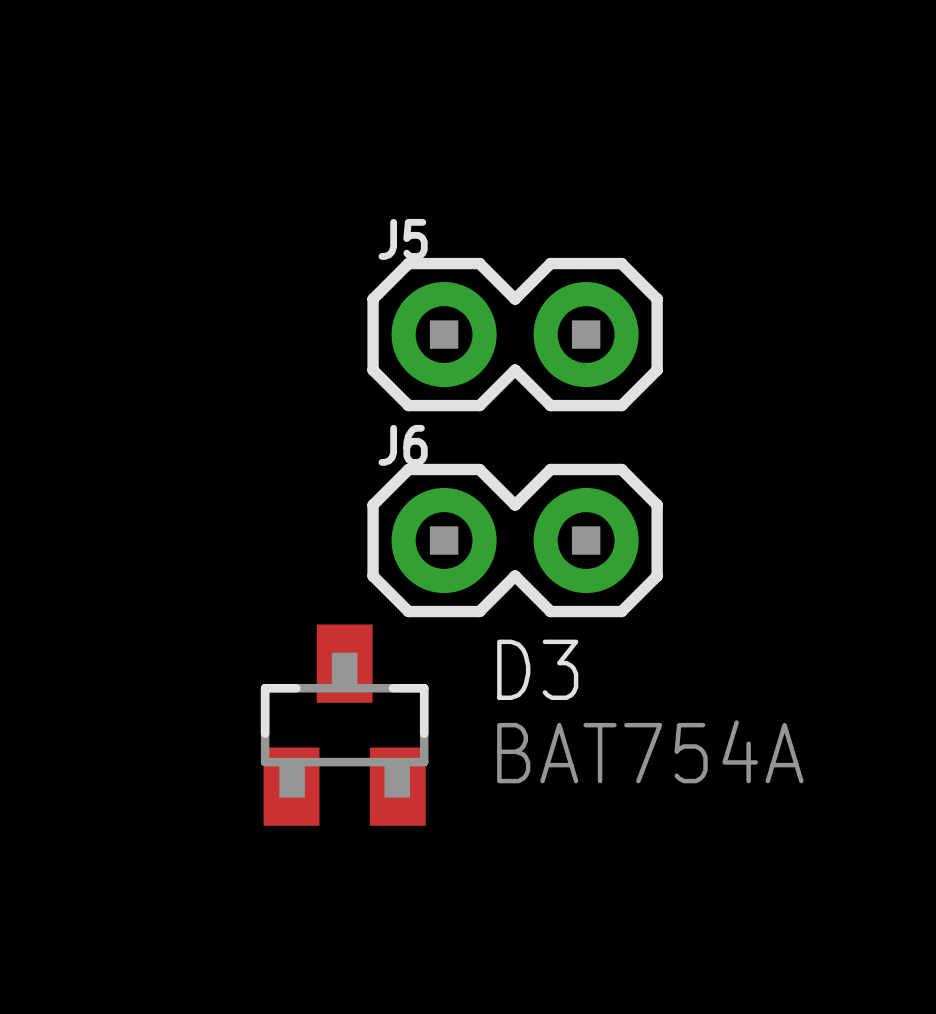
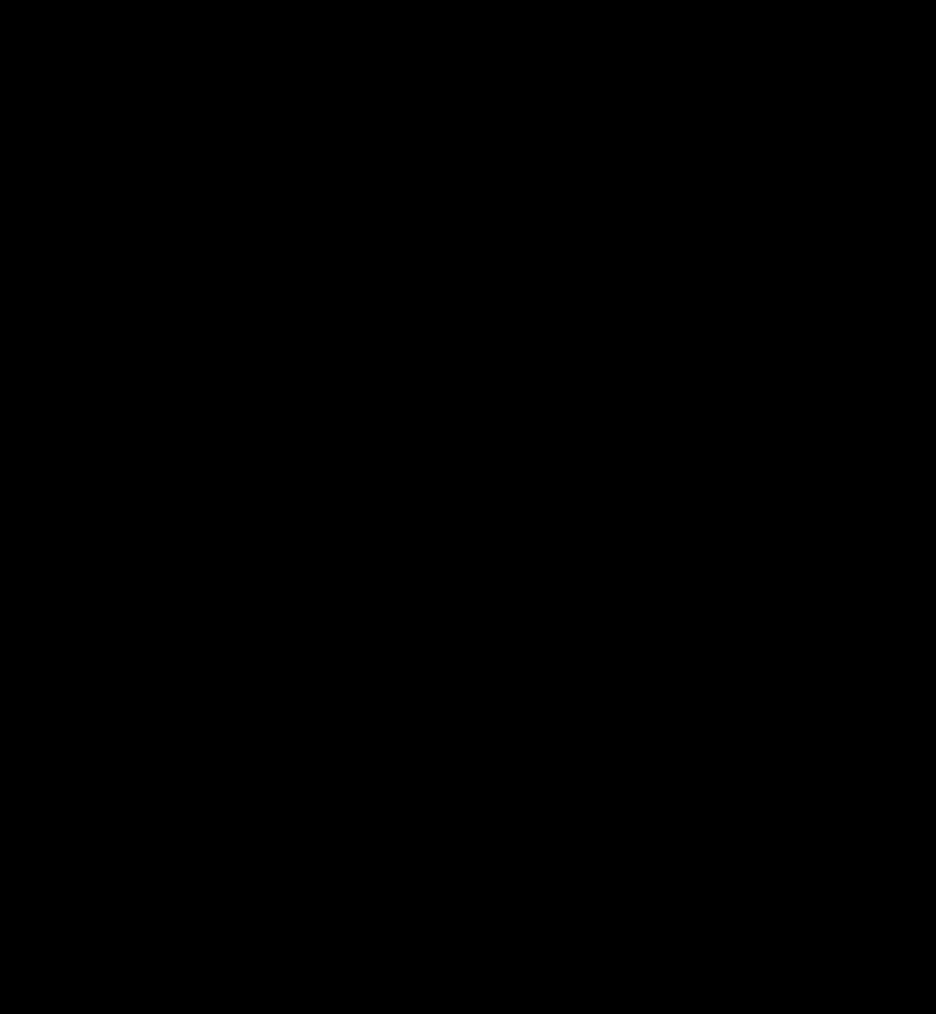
J5: (515, 334) -> none
J6: (515, 540) -> none
D3: BAT754A (344, 725) -> none

